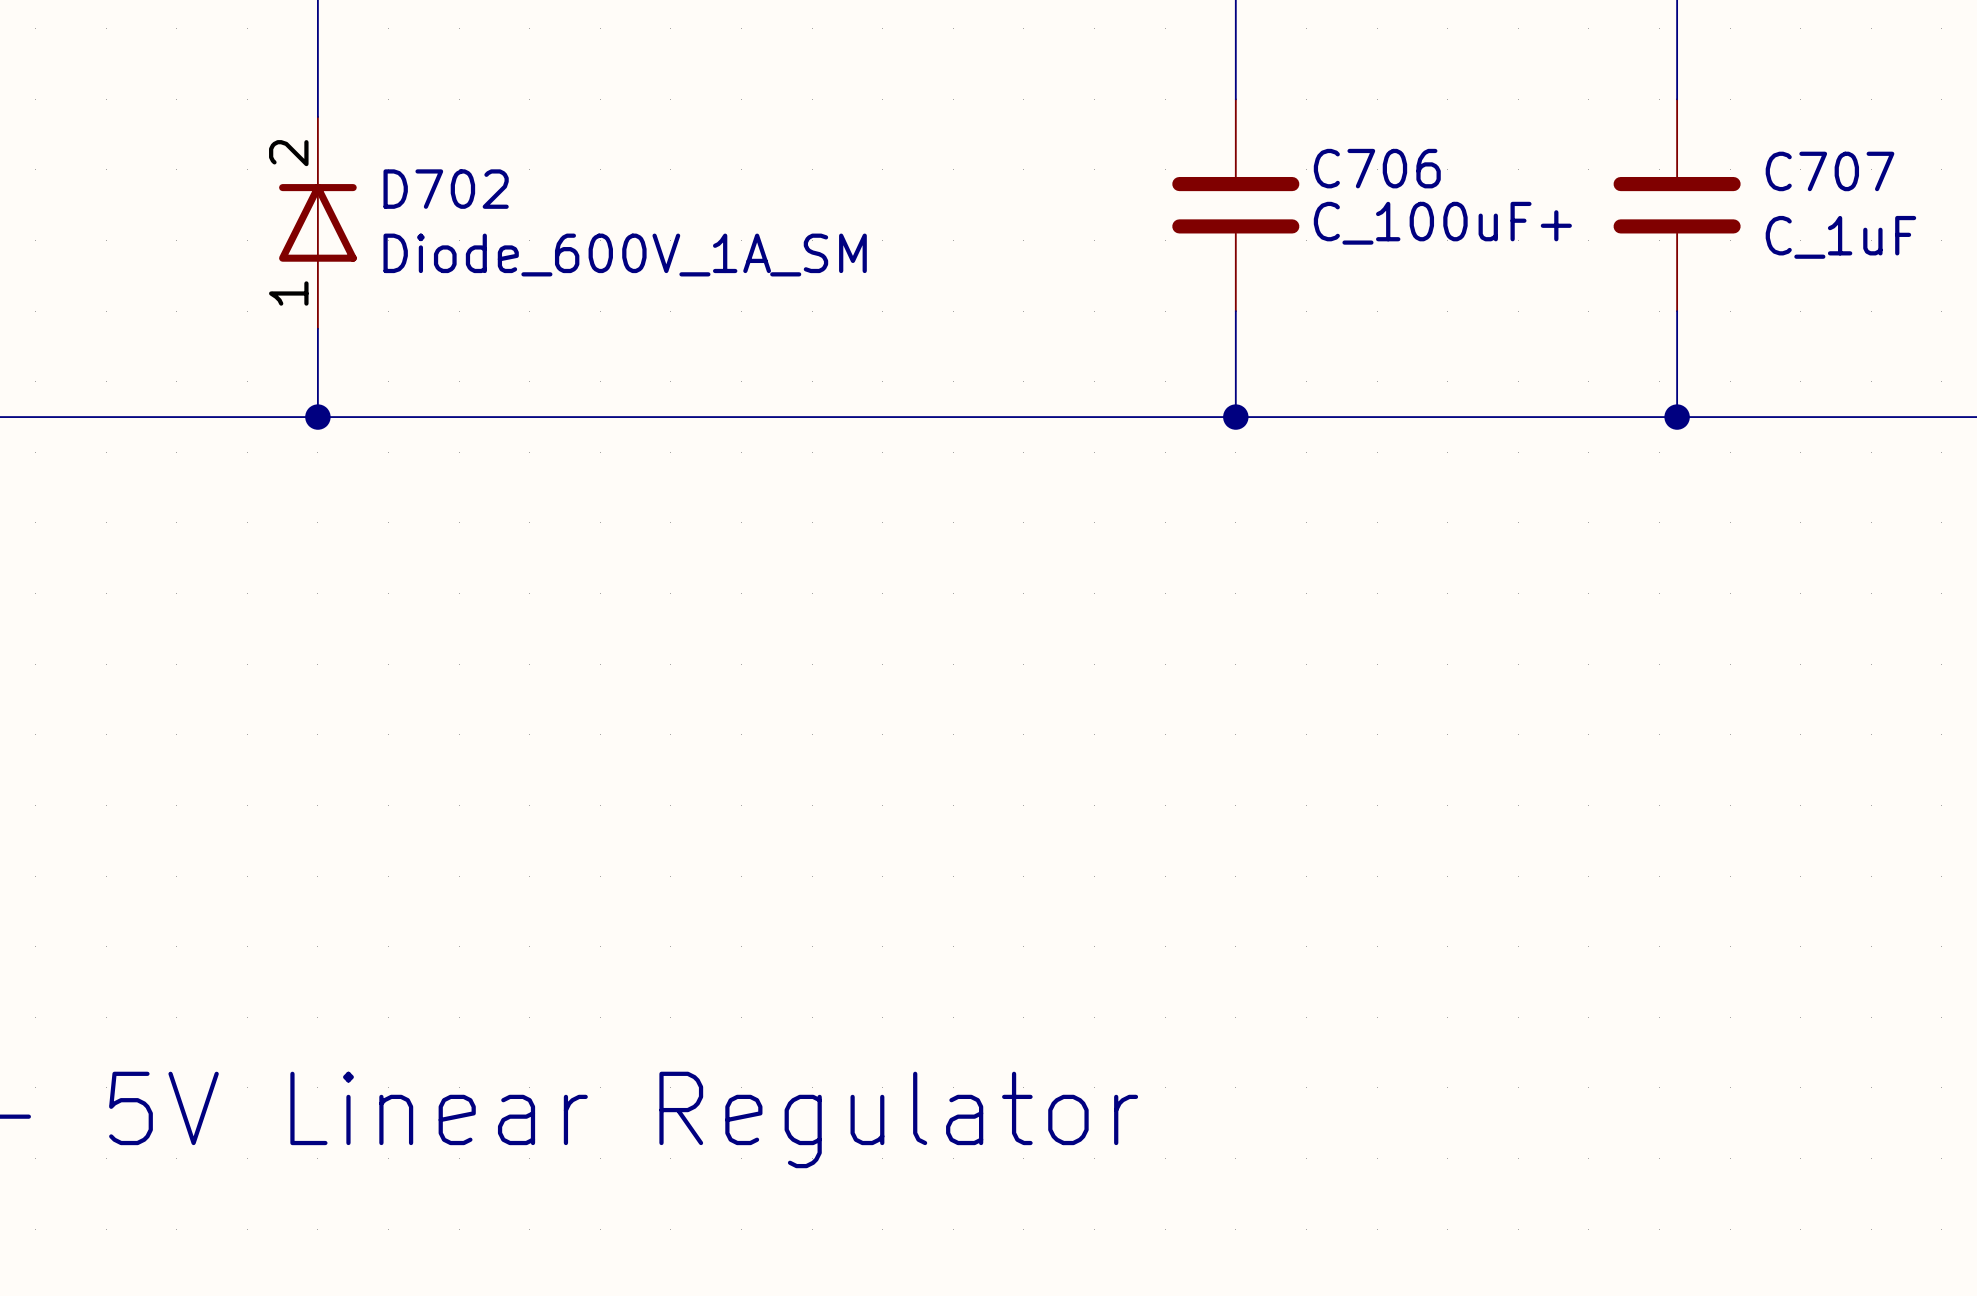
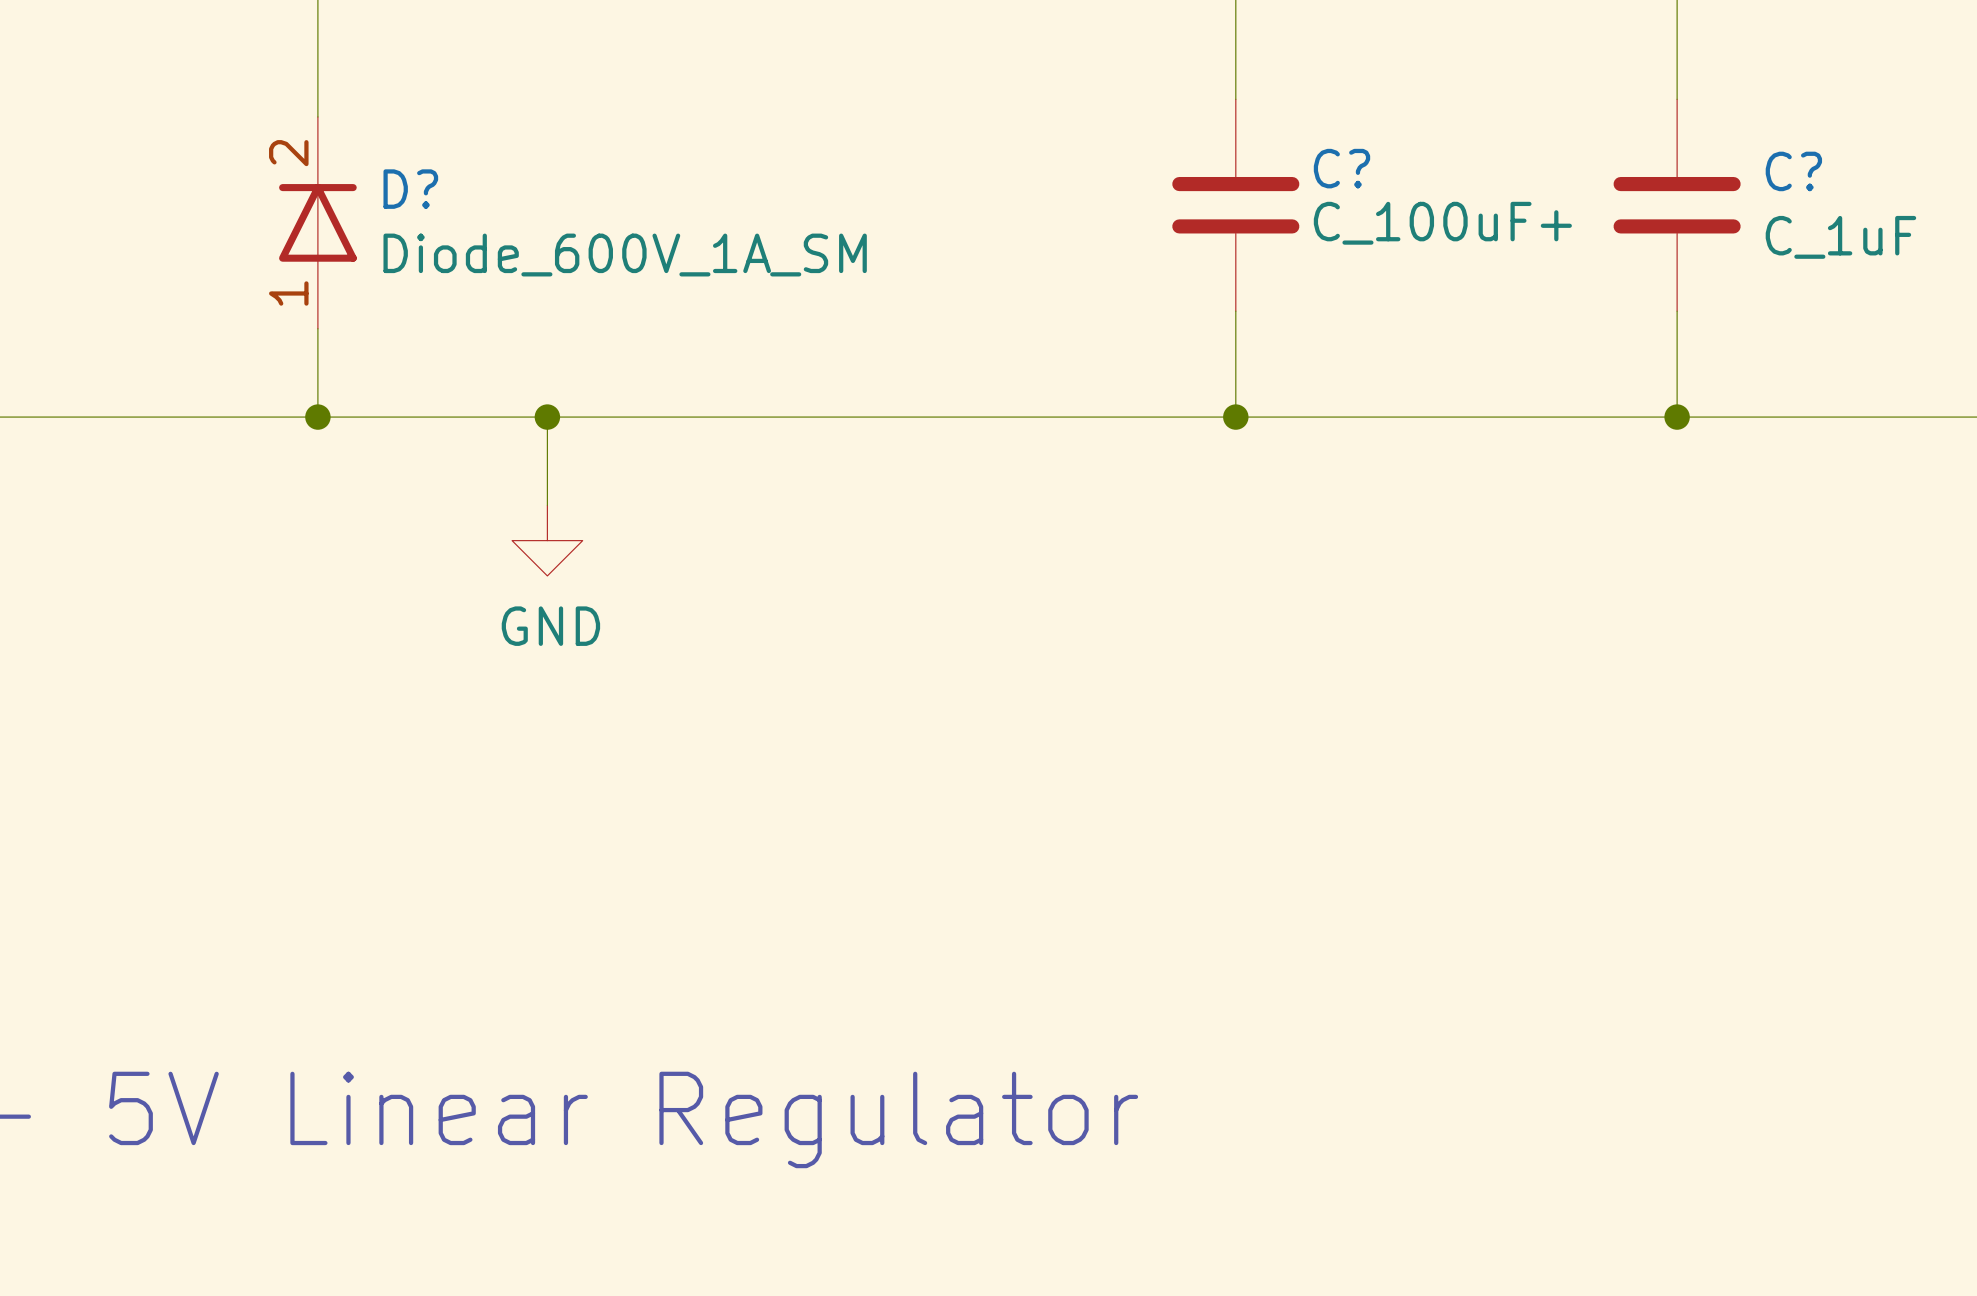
C706 name: C706 (1377, 168) -> C? (1341, 168)
C707 name: C707 (1830, 171) -> C? (1793, 171)
D702 name: D702 (446, 189) -> D? (410, 189)
wire: none -> (547, 417) (547, 505)
junction: none -> (547, 417)
power symbol: none -> GND (547, 540)

